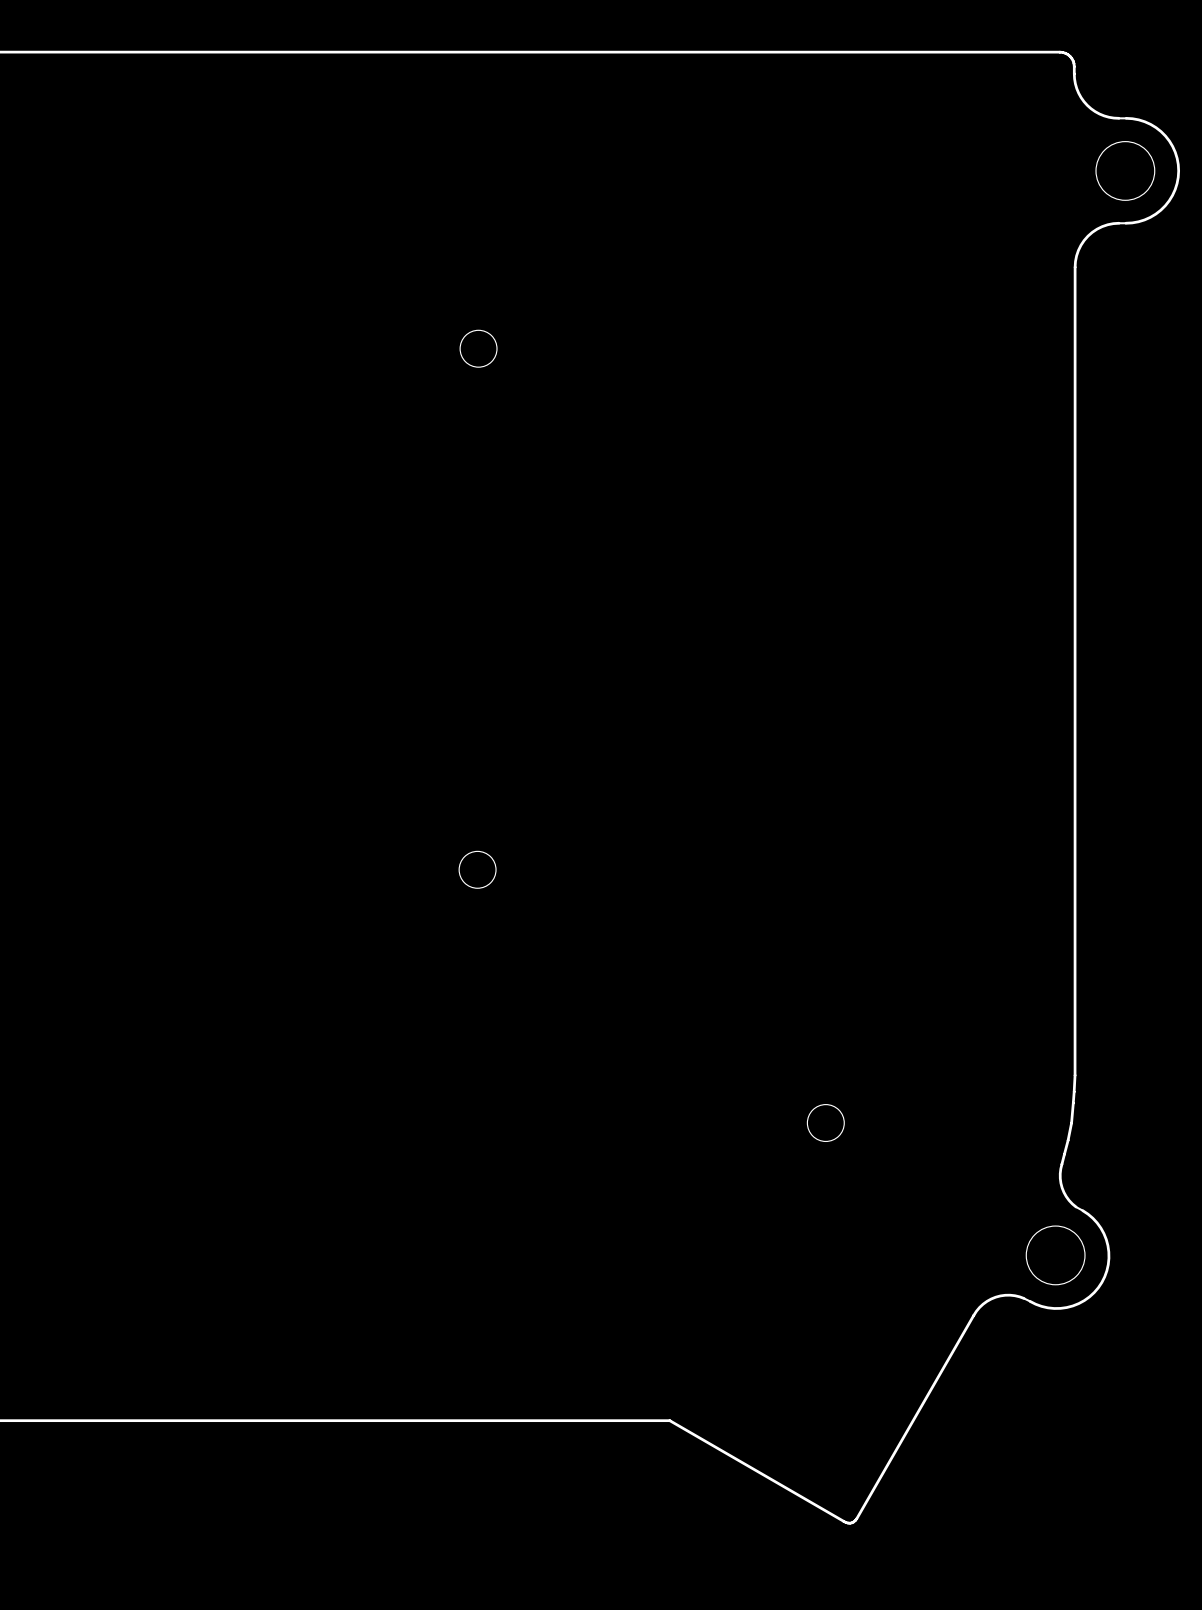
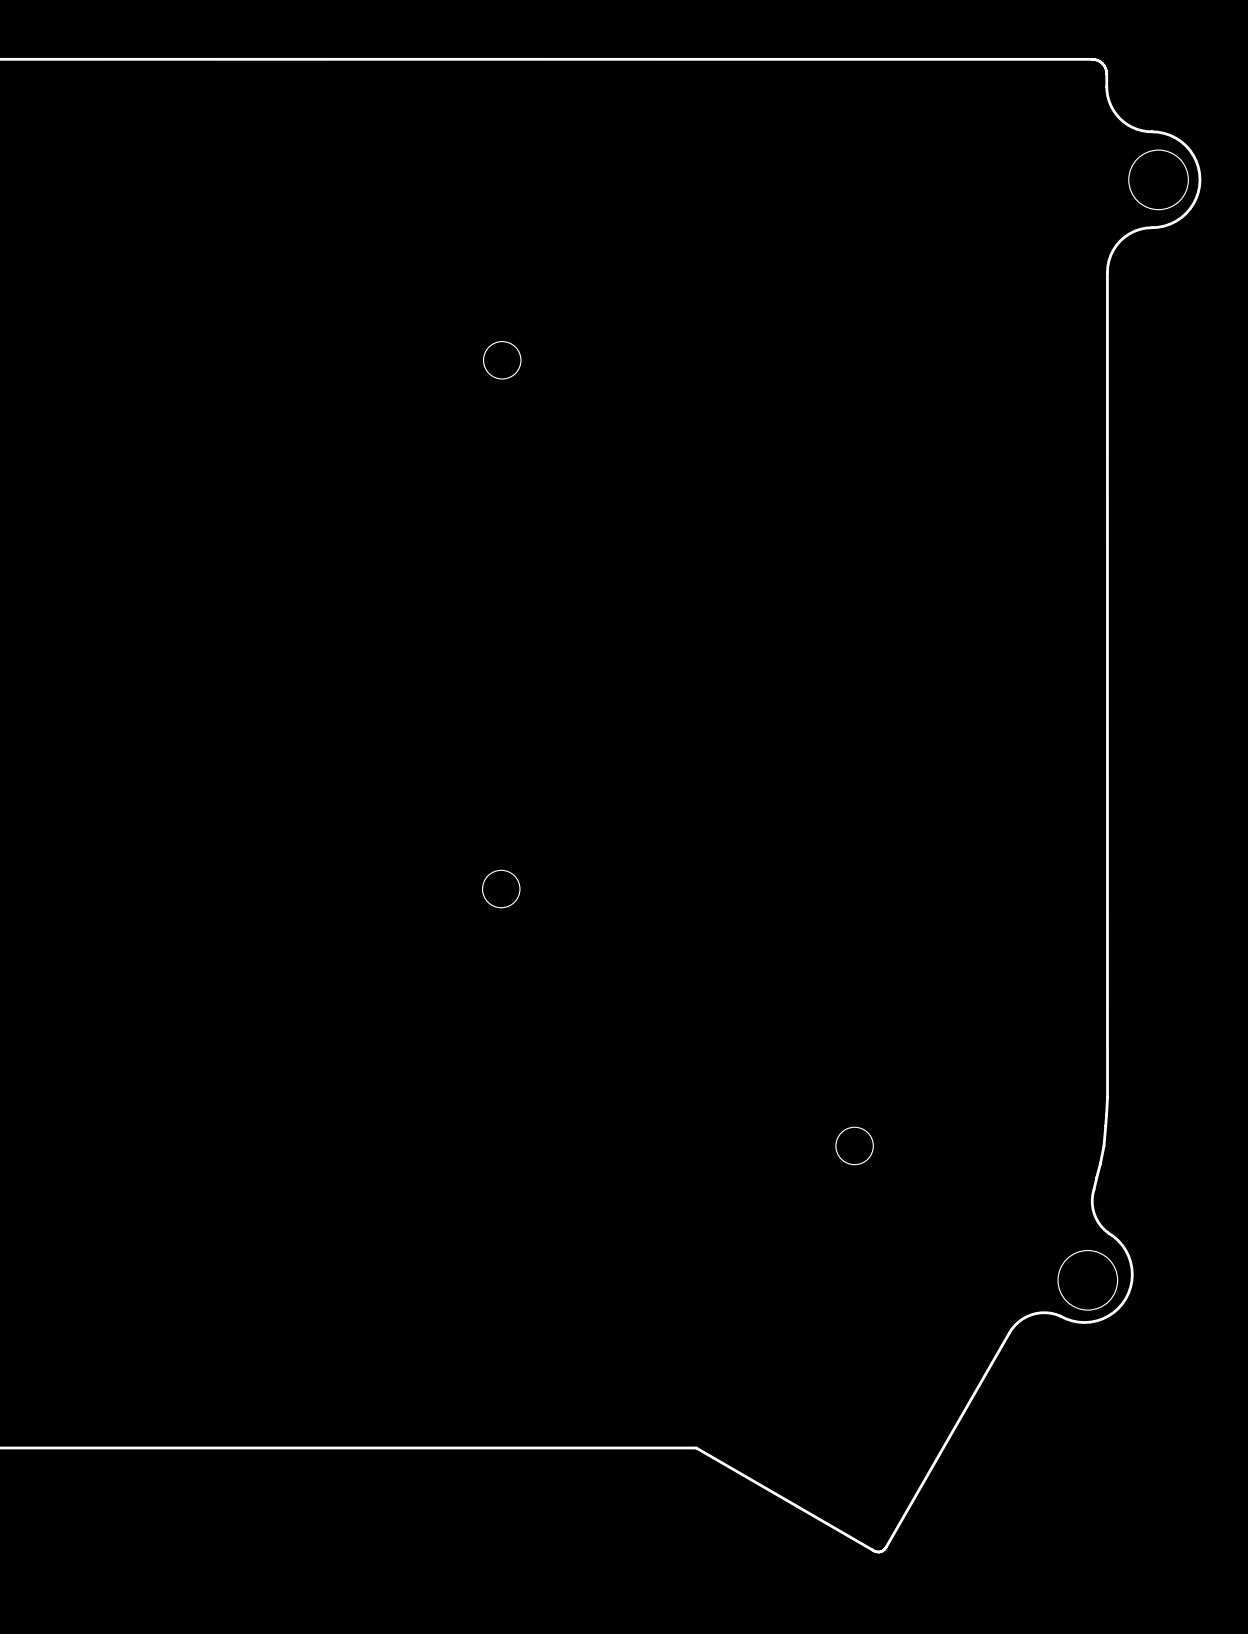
board edge: (1074, 66) (1076, 88) (1087, 105) (1104, 115) (1138, 119) (1156, 127) (1165, 136) (1172, 146) (1177, 158) (1178, 170) (1175, 189) (1169, 200) (1160, 210) (1150, 217) (1138, 221) (1113, 223) (1097, 229) (1081, 245) (1075, 261) (1075, 1075) -> (1106, 73) (1107, 96) (1116, 114) (1132, 127) (1164, 133) (1181, 141) (1193, 155) (1198, 167) (1200, 179) (1196, 198) (1185, 213) (1170, 224) (1140, 229) (1124, 236) (1113, 250) (1107, 266) (1107, 1097)
board edge: (1064, 1154) (1060, 1173) (1063, 1192) (1072, 1203) (1097, 1222) (1106, 1239) (1108, 1251) (1108, 1264) (1101, 1282) (1089, 1296) (1078, 1303) (1066, 1307) (1047, 1307) (1010, 1295) (991, 1298) (979, 1307) (856, 1518) -> (1096, 1177) (1092, 1199) (1094, 1213) (1101, 1226) (1122, 1245) (1130, 1262) (1131, 1280) (1125, 1298) (1113, 1312) (1096, 1320) (1078, 1322) (1055, 1314) (1041, 1312) (1027, 1316) (1015, 1325) (886, 1547)

